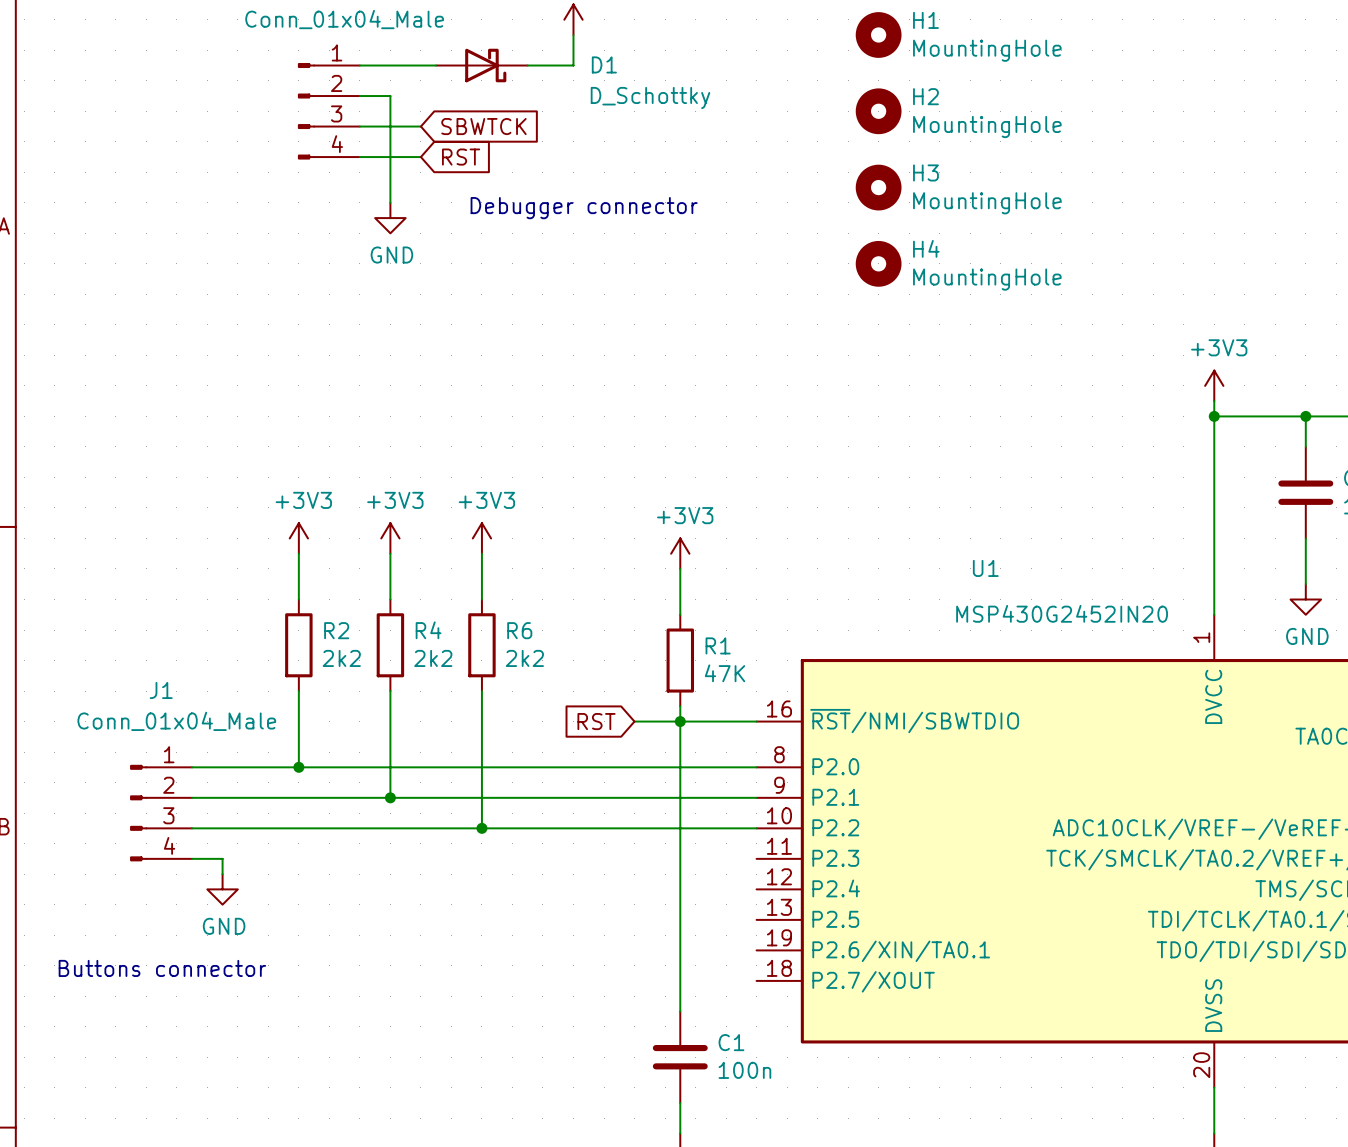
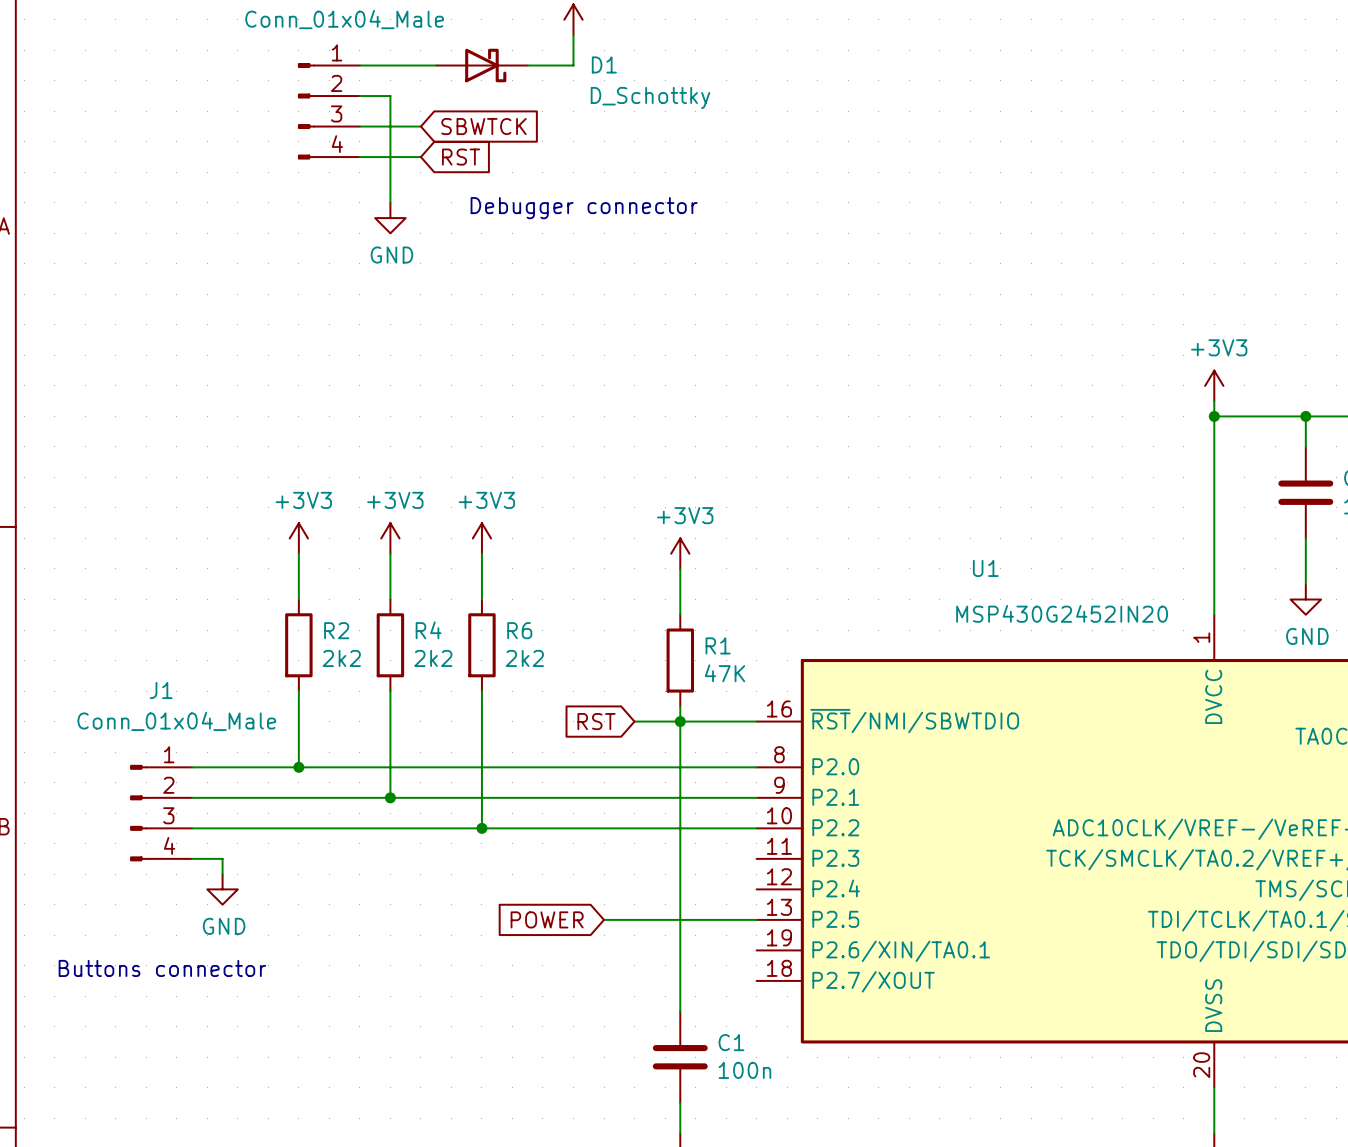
H1: MountingHole (878, 35) -> none
H2: MountingHole (878, 111) -> none
H3: MountingHole (878, 187) -> none
H4: MountingHole (878, 263) -> none
global label: none -> POWER (547, 919)
wire: none -> (604, 919) (756, 919)

